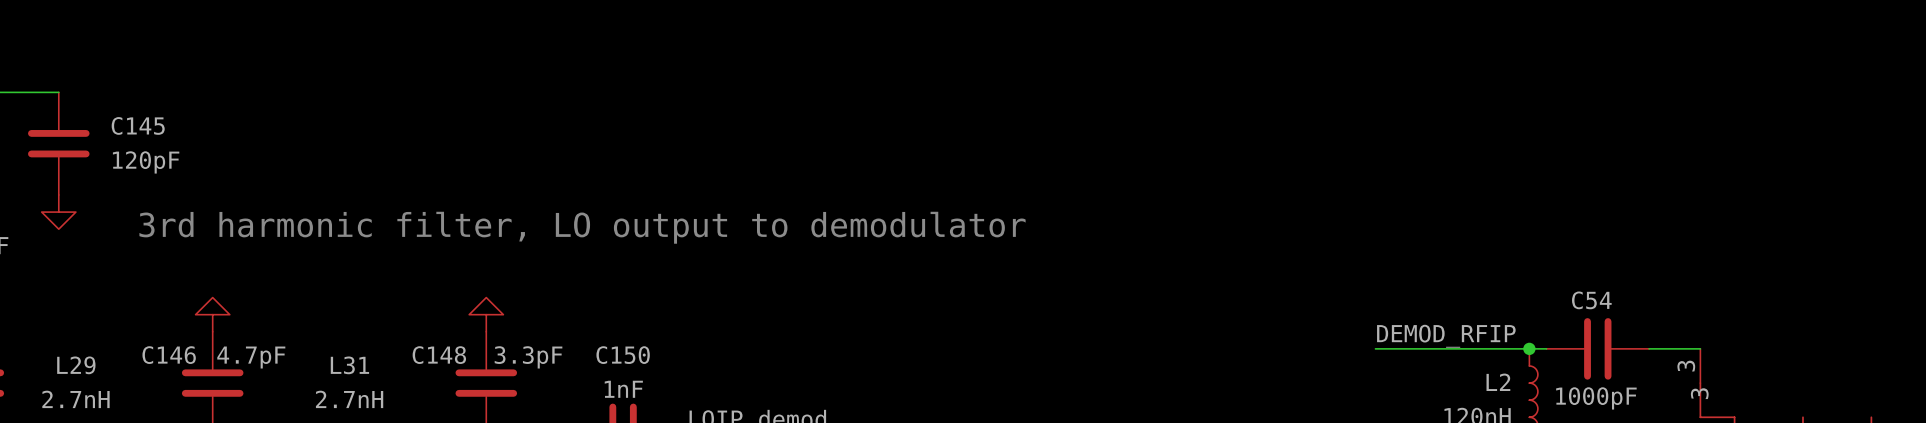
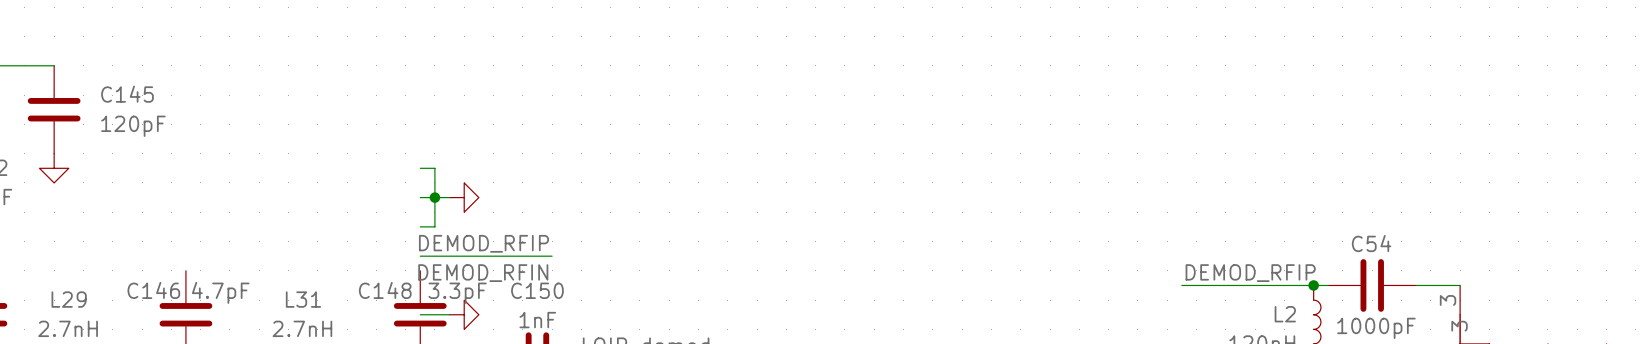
wire: none -> (420, 168) (434, 168) (434, 226) (420, 226)
text: 3rd harmonic filter, LO output to demodulator (582, 227) -> none
wire: none -> (420, 197) (449, 197)
junction: none -> (434, 197)
power symbol: none -> (464, 197)
label: none -> DEMOD_RFIP (483, 243)
power symbol: (212, 314) -> none
wire: none -> (420, 256) (552, 256)
power symbol: (486, 314) -> none
label: none -> DEMOD_RFIN (483, 273)
wire: none -> (420, 314) (449, 314)
power symbol: none -> (464, 314)

